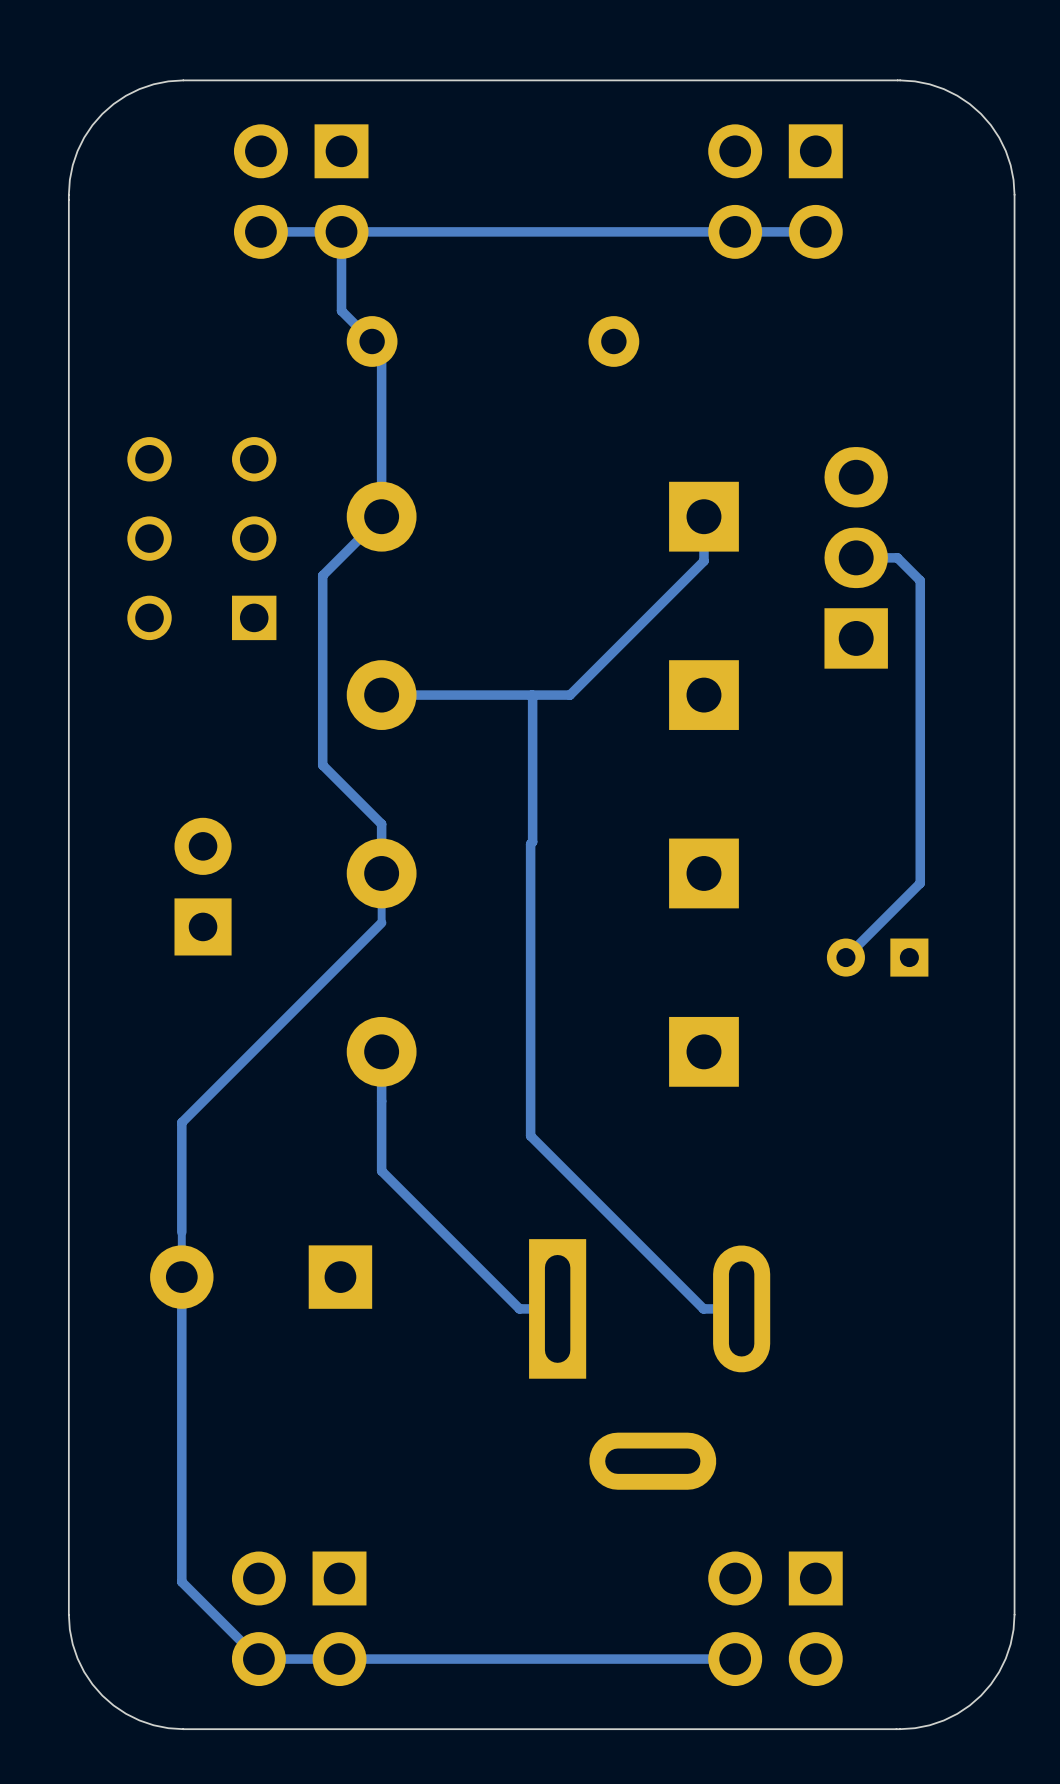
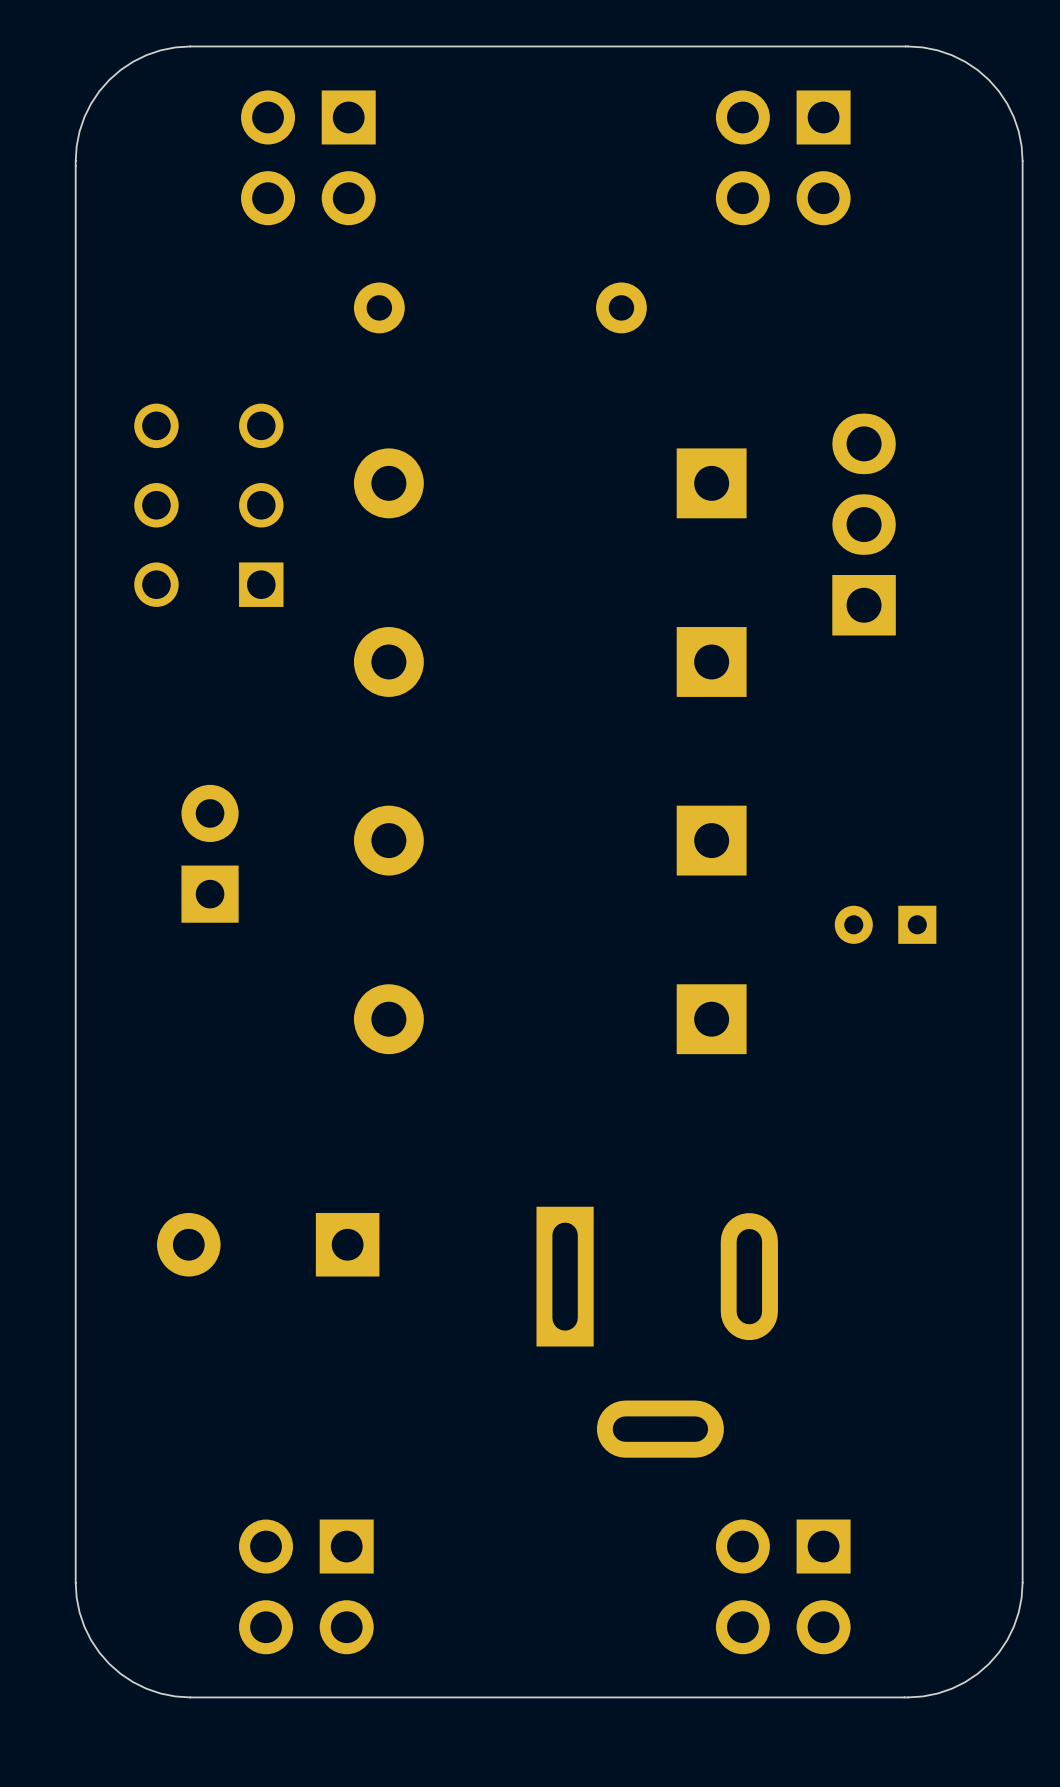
track: (341, 231) (341, 310) (381, 351) (381, 516) (322, 575) (322, 765) (381, 824) (381, 922) (181, 1122) (181, 1581) (258, 1659) (735, 1659) -> none
track: (815, 231) (260, 231) -> none
track: (703, 516) (703, 561) (570, 695) (381, 695) -> none
track: (856, 557) (897, 557) (920, 580) (920, 883) (845, 957) -> none
track: (532, 695) (530, 1135) (703, 1308) (741, 1308) -> none
track: (381, 1051) (381, 1171) (519, 1308) (557, 1308) -> none

